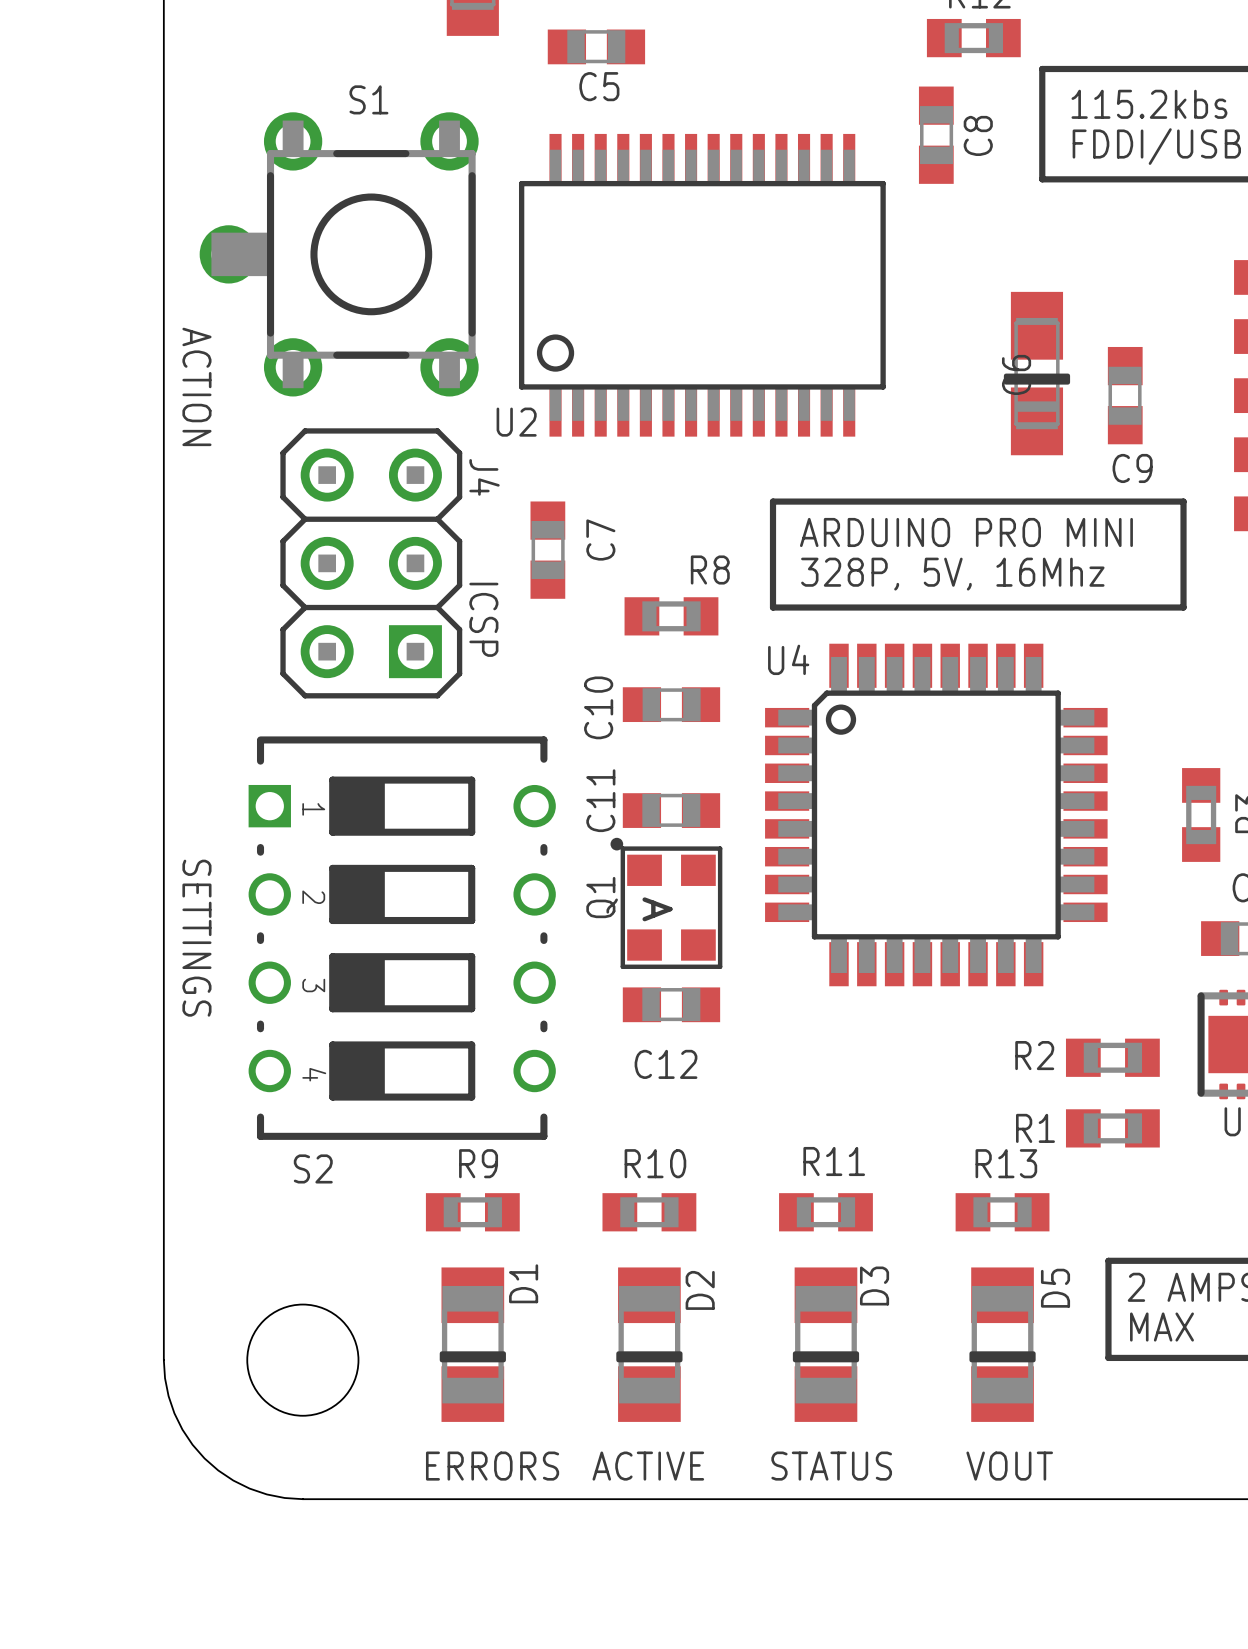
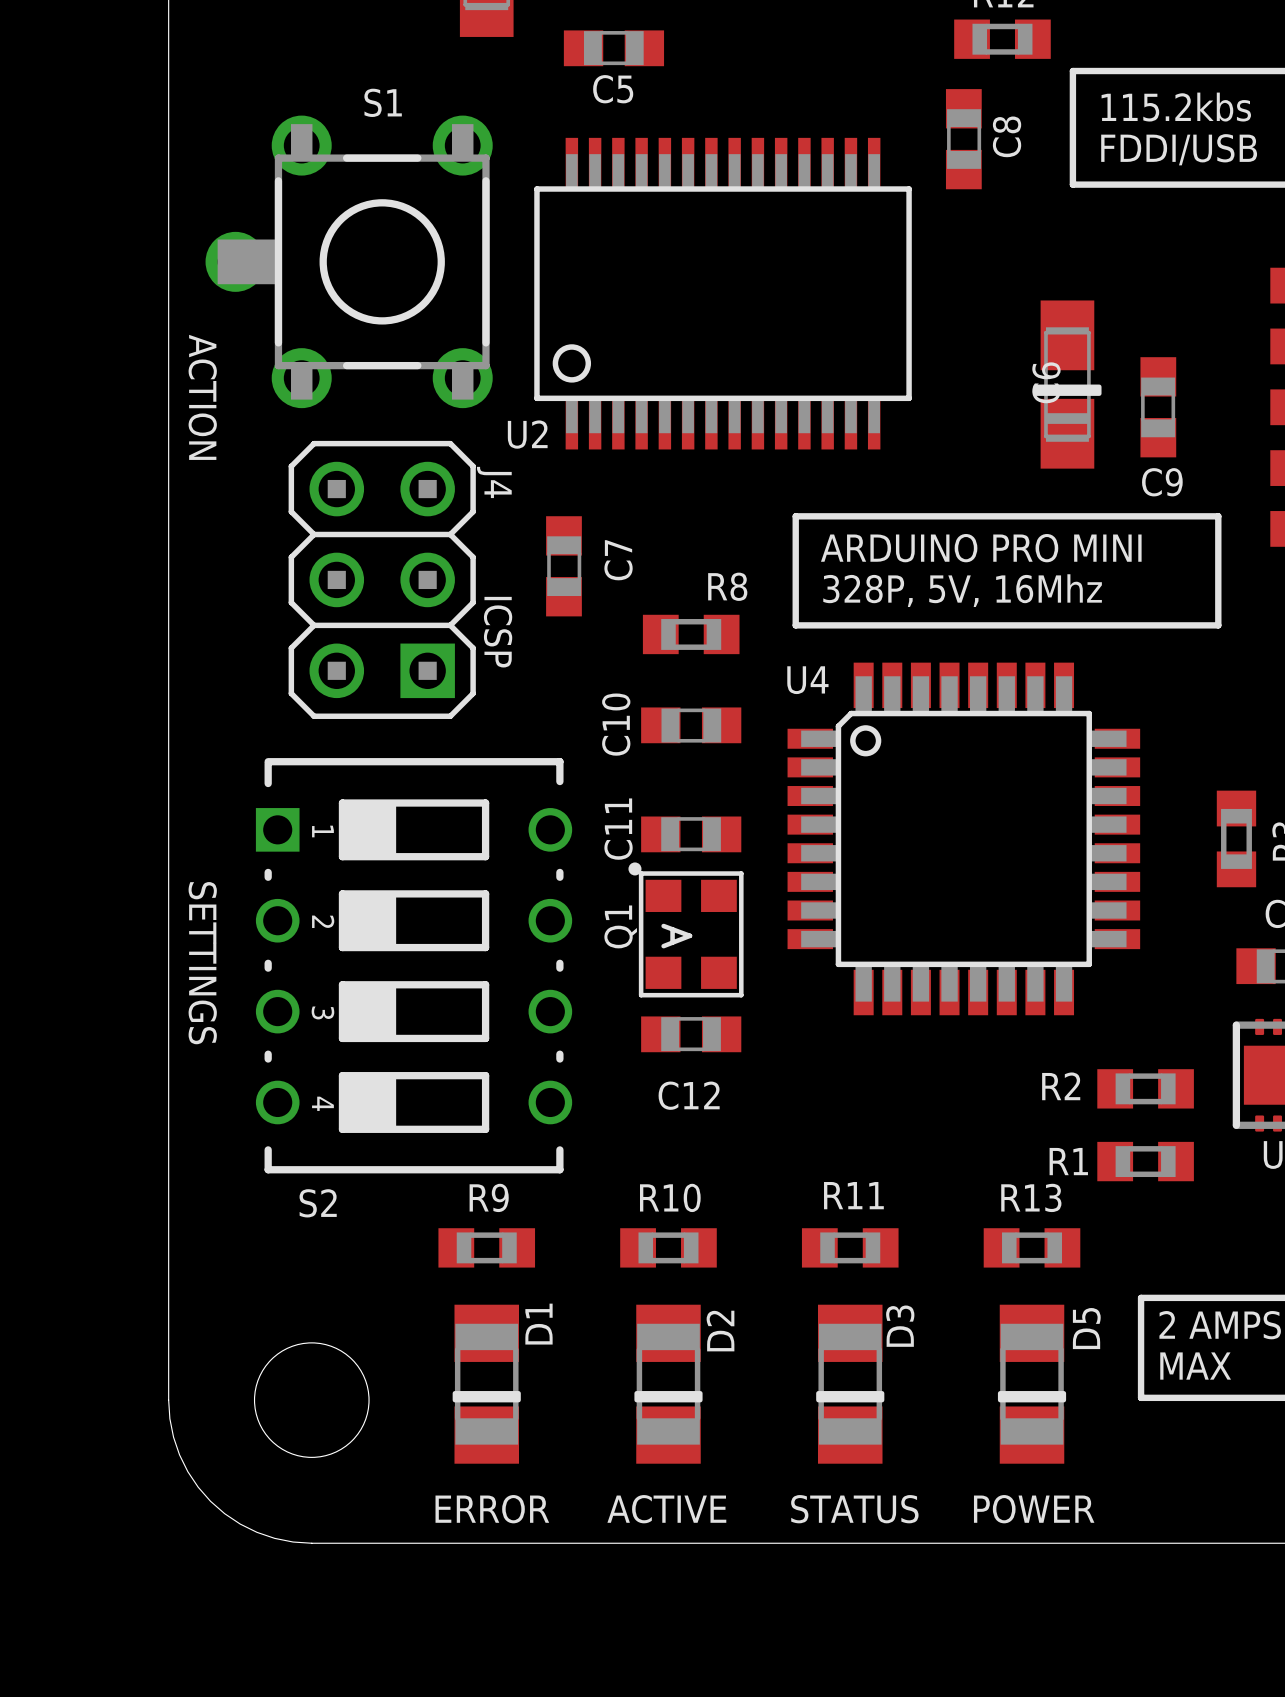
text: ERRORS (492, 1466) -> ERROR (492, 1509)
text: VOUT (1009, 1466) -> POWER (1034, 1509)

